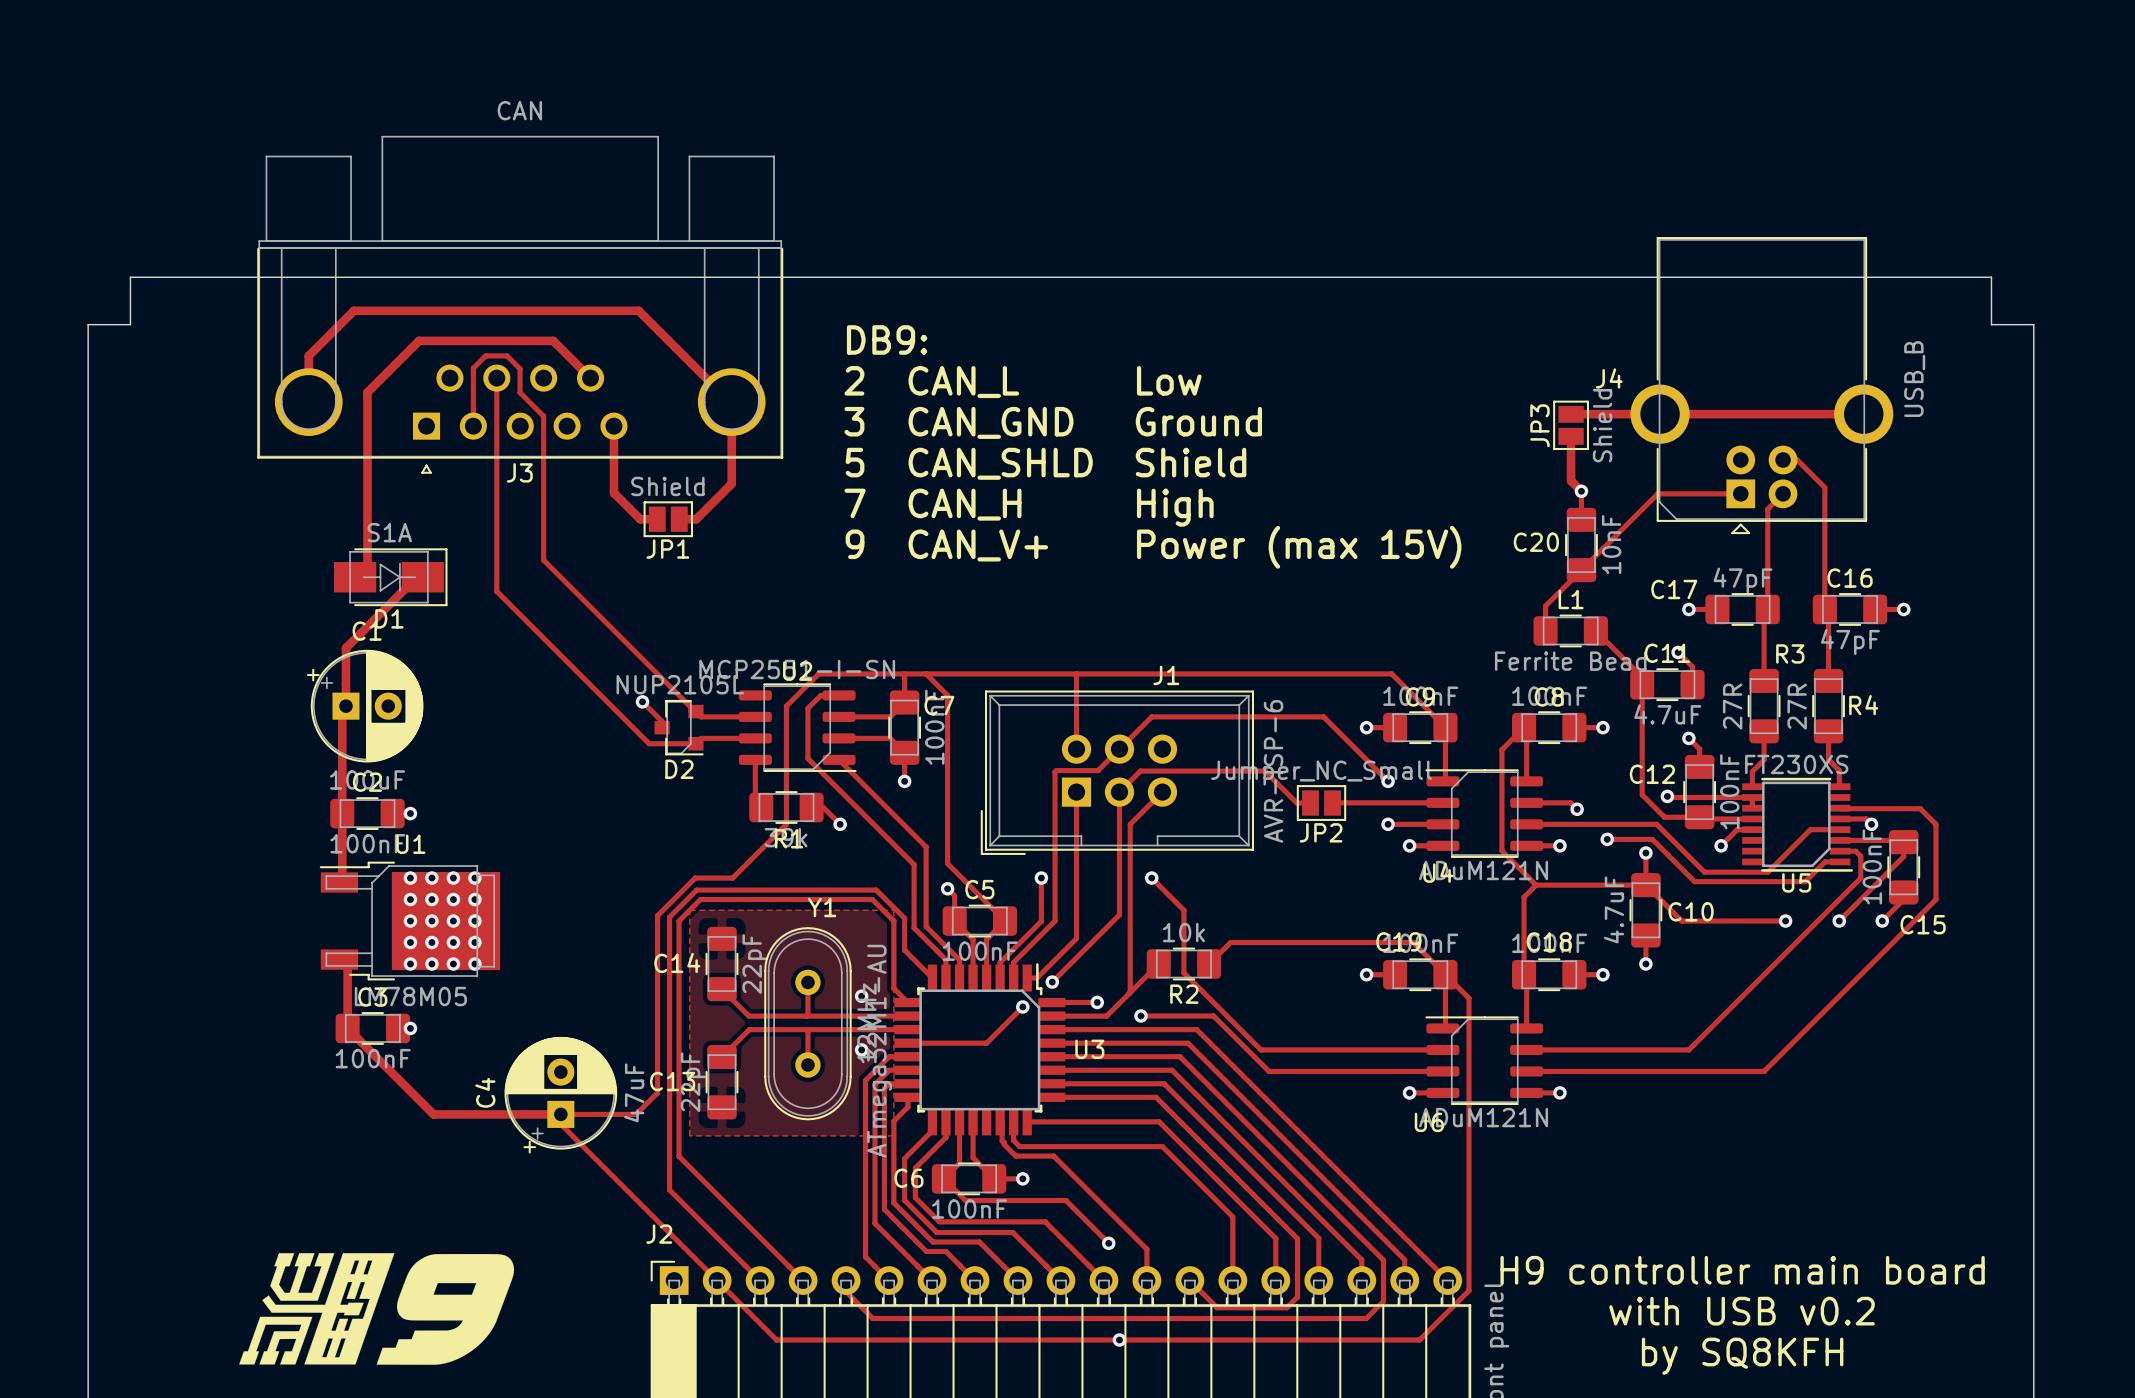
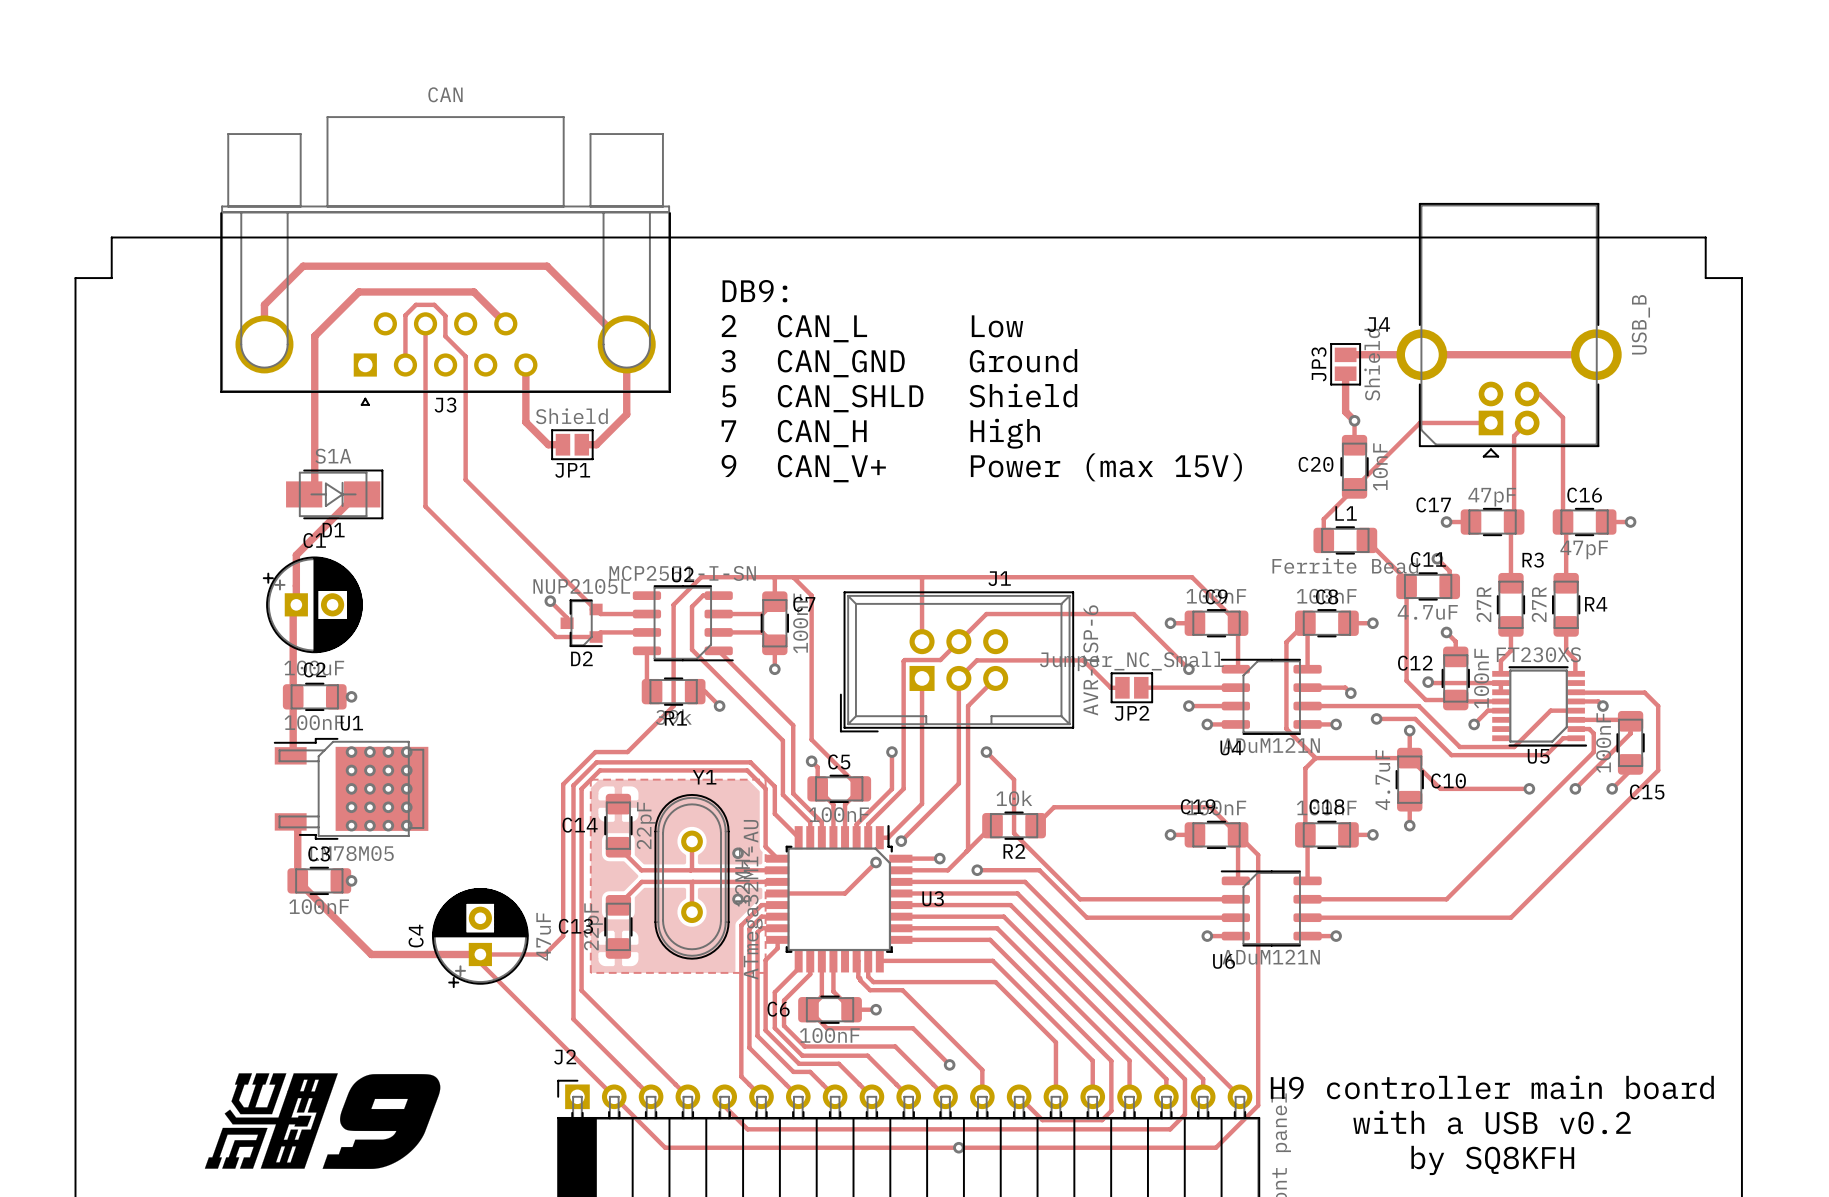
text: with USB v0.2 (1742, 1311) -> with a USB v0.2 (1492, 1122)

